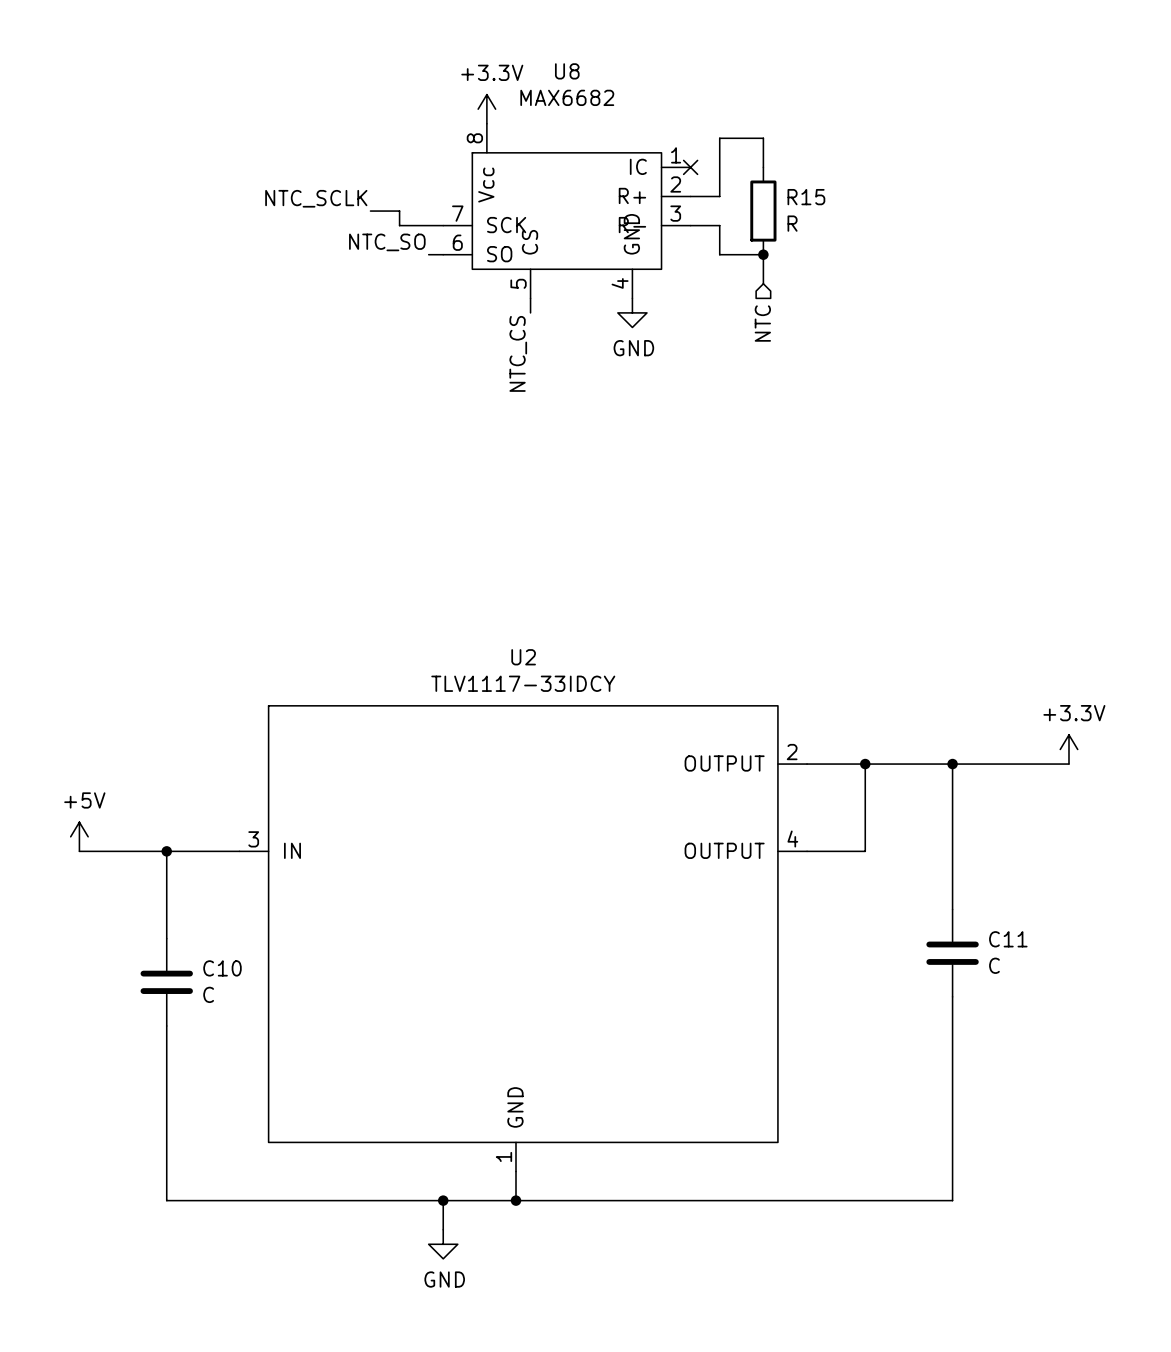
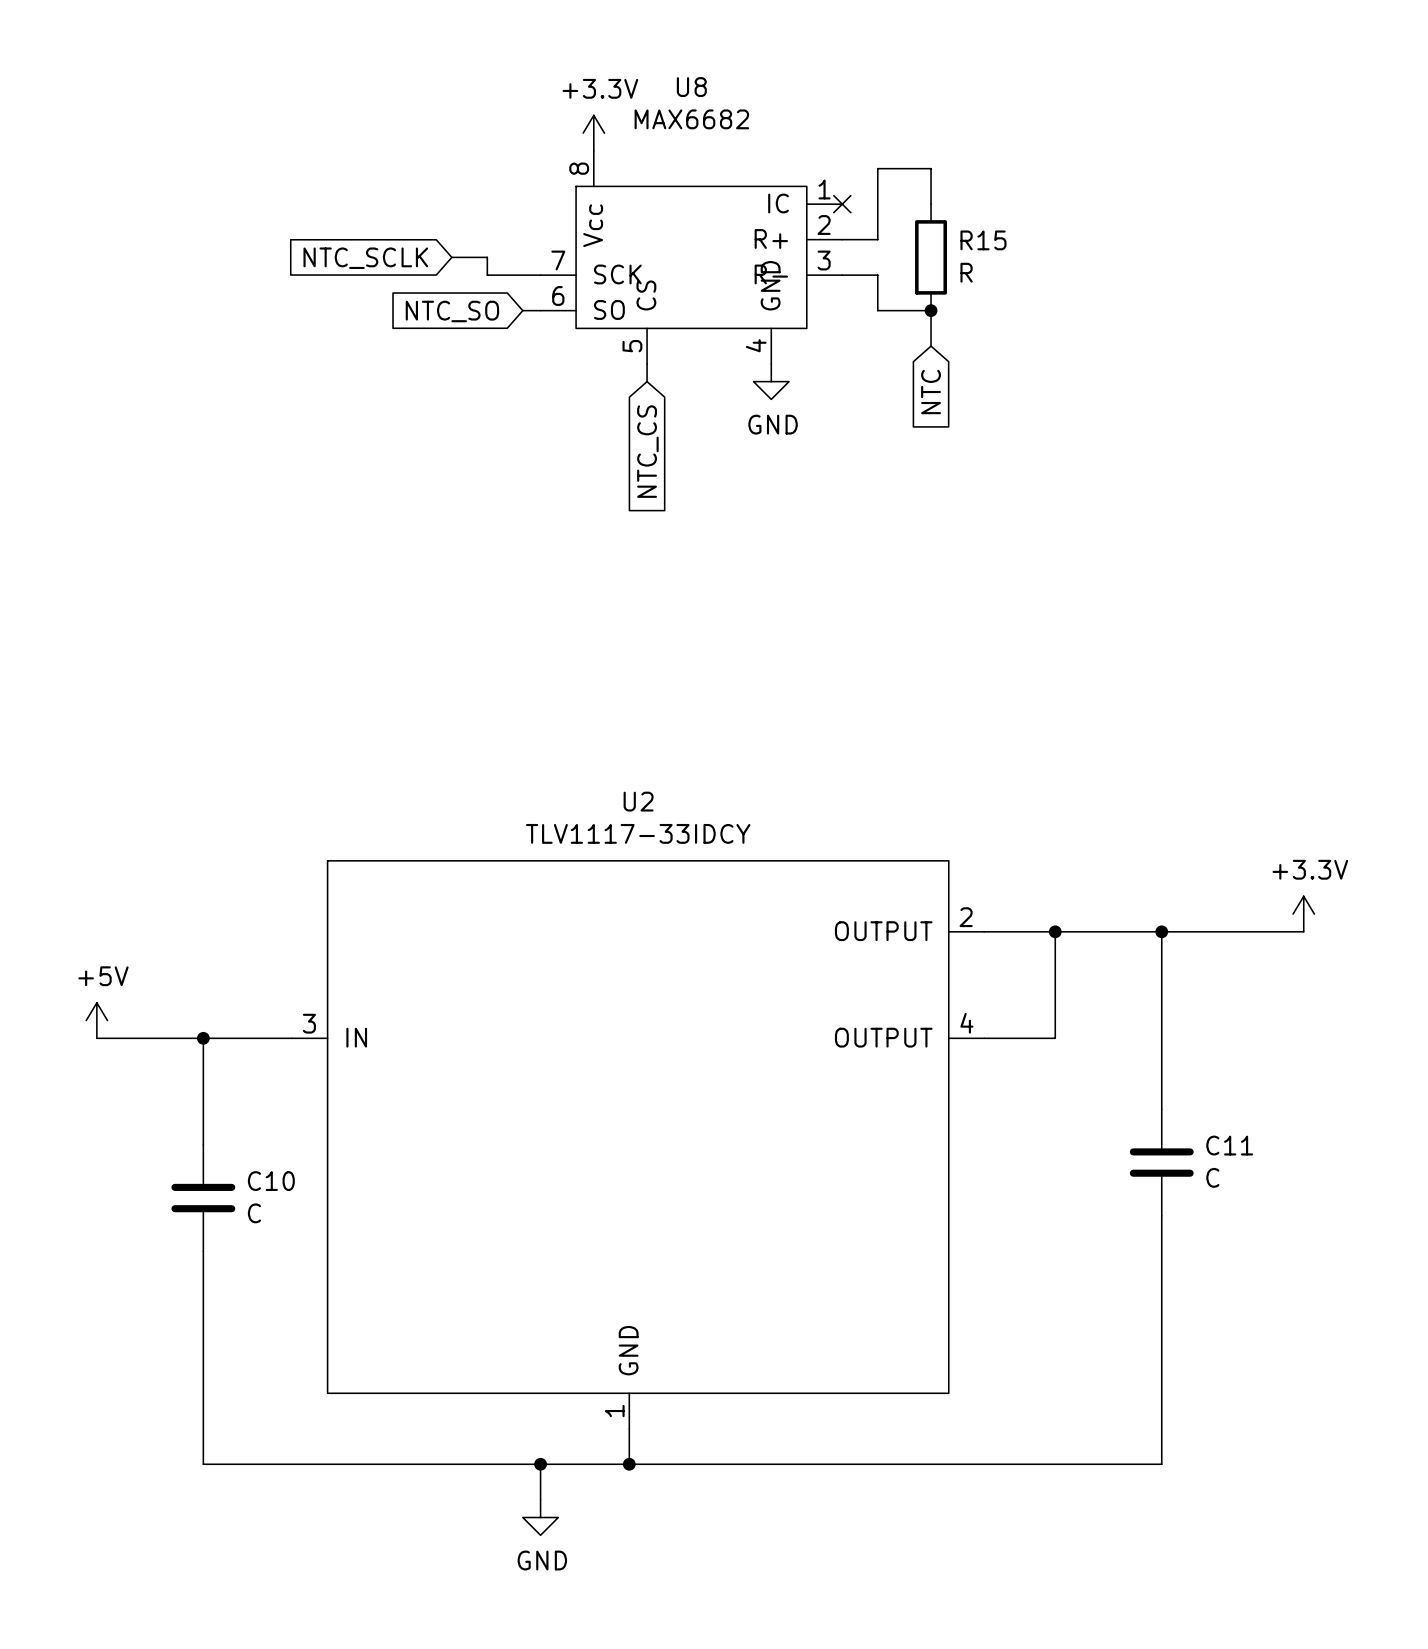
label: NTC_SCLK (316, 198) -> none
global label: none -> NTC_SCLK (365, 258)
label: NTC_SO (387, 242) -> none
global label: none -> NTC_SO (452, 311)
global label: none -> NTC (931, 392)
hierarchical label: NTC (762, 323) -> none
label: NTC_CS (518, 353) -> none
global label: none -> NTC_CS (647, 451)

